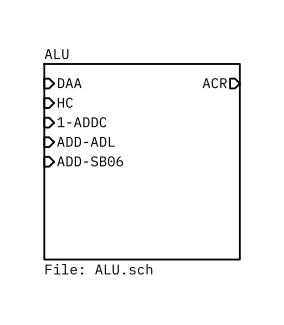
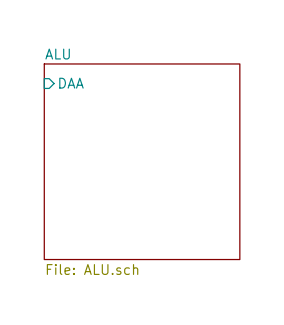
sheet pin: ACR (214, 83) -> none
sheet pin: HC (65, 102) -> none
sheet pin: 1-ADDC (81, 122) -> none
sheet pin: ADD-ADL (85, 141) -> none
sheet pin: ADD-SB06 (90, 161) -> none

